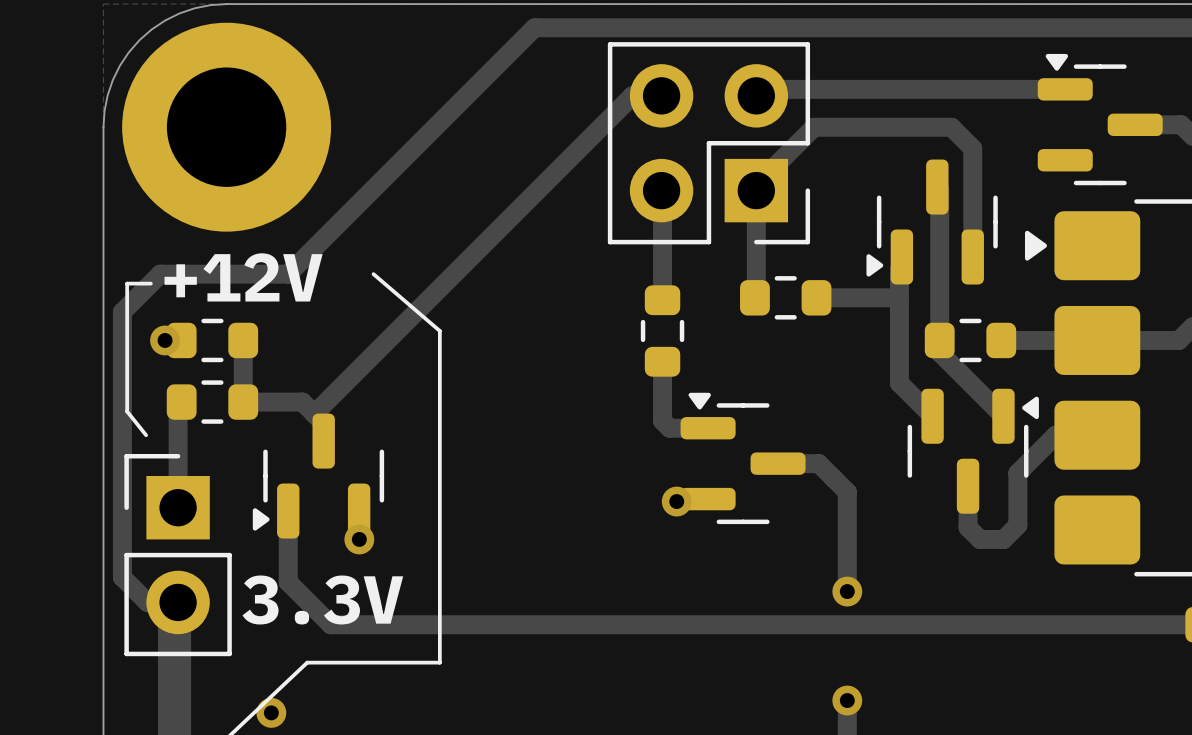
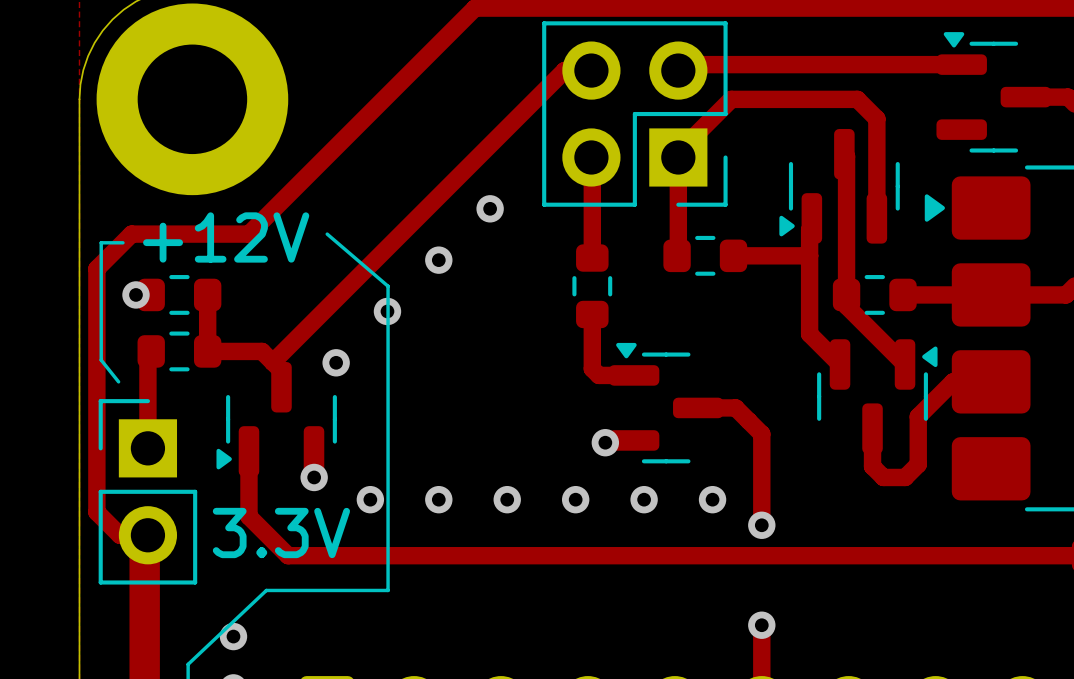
via: none -> (490, 208)
via: none -> (438, 260)
via: none -> (387, 311)
via: none -> (336, 362)
via: none -> (370, 499)
via: none -> (438, 499)
via: none -> (507, 499)
via: none -> (575, 499)
via: none -> (644, 499)
via: none -> (712, 499)

